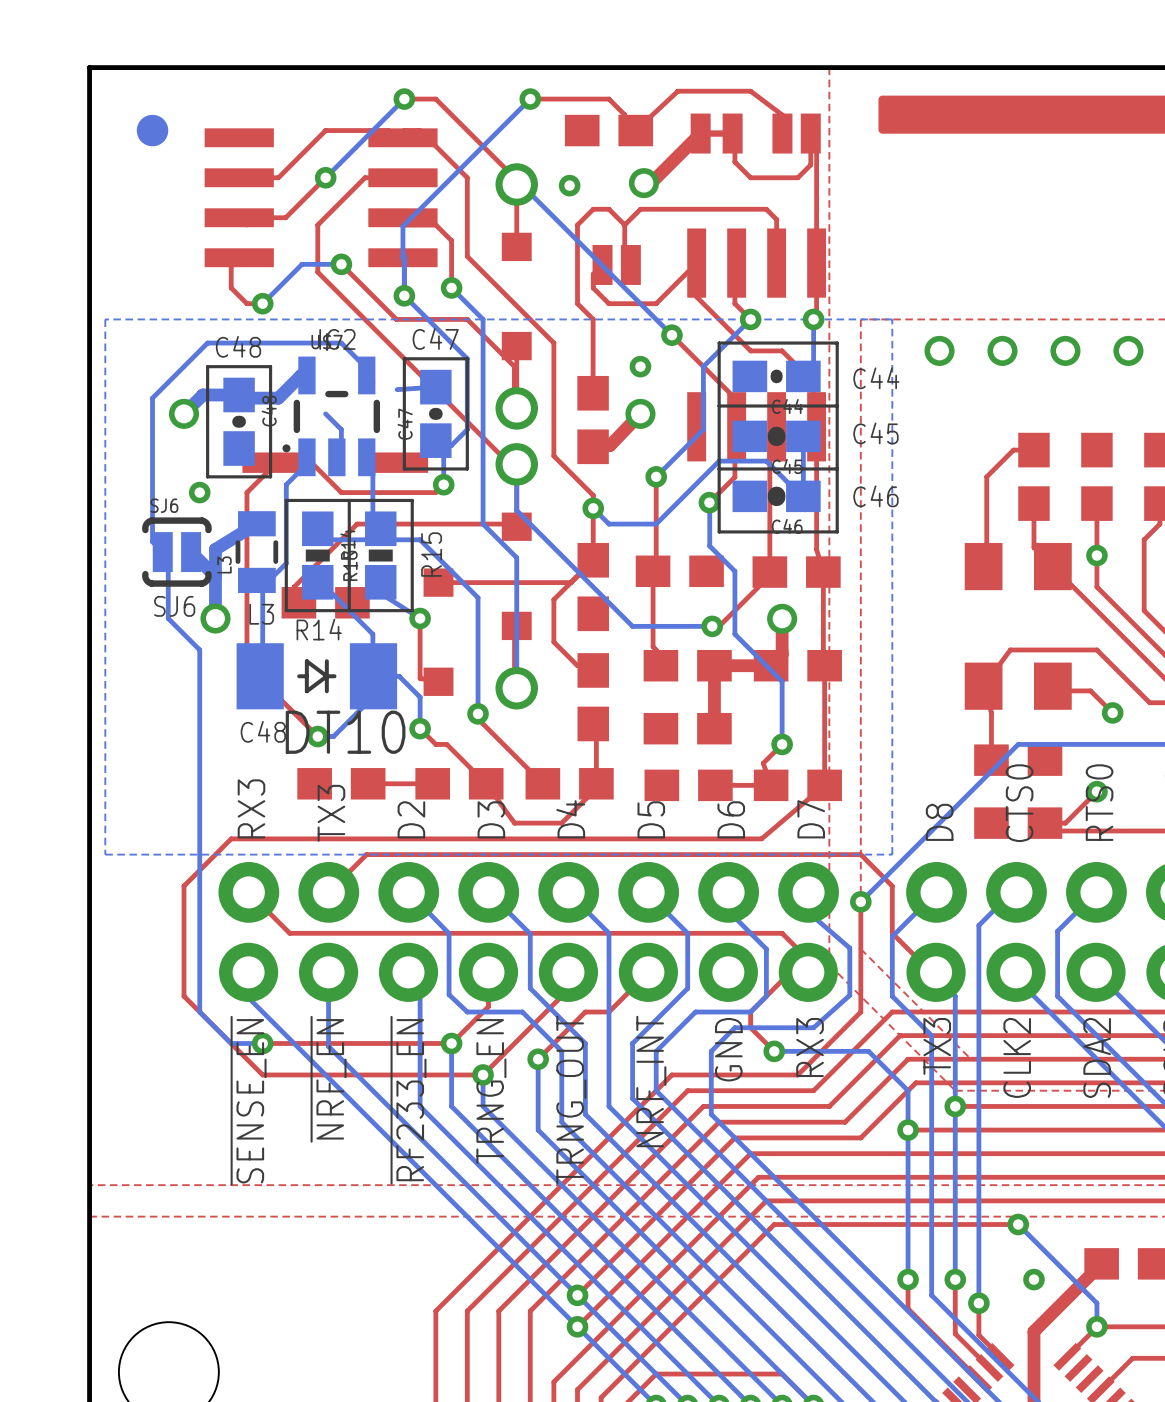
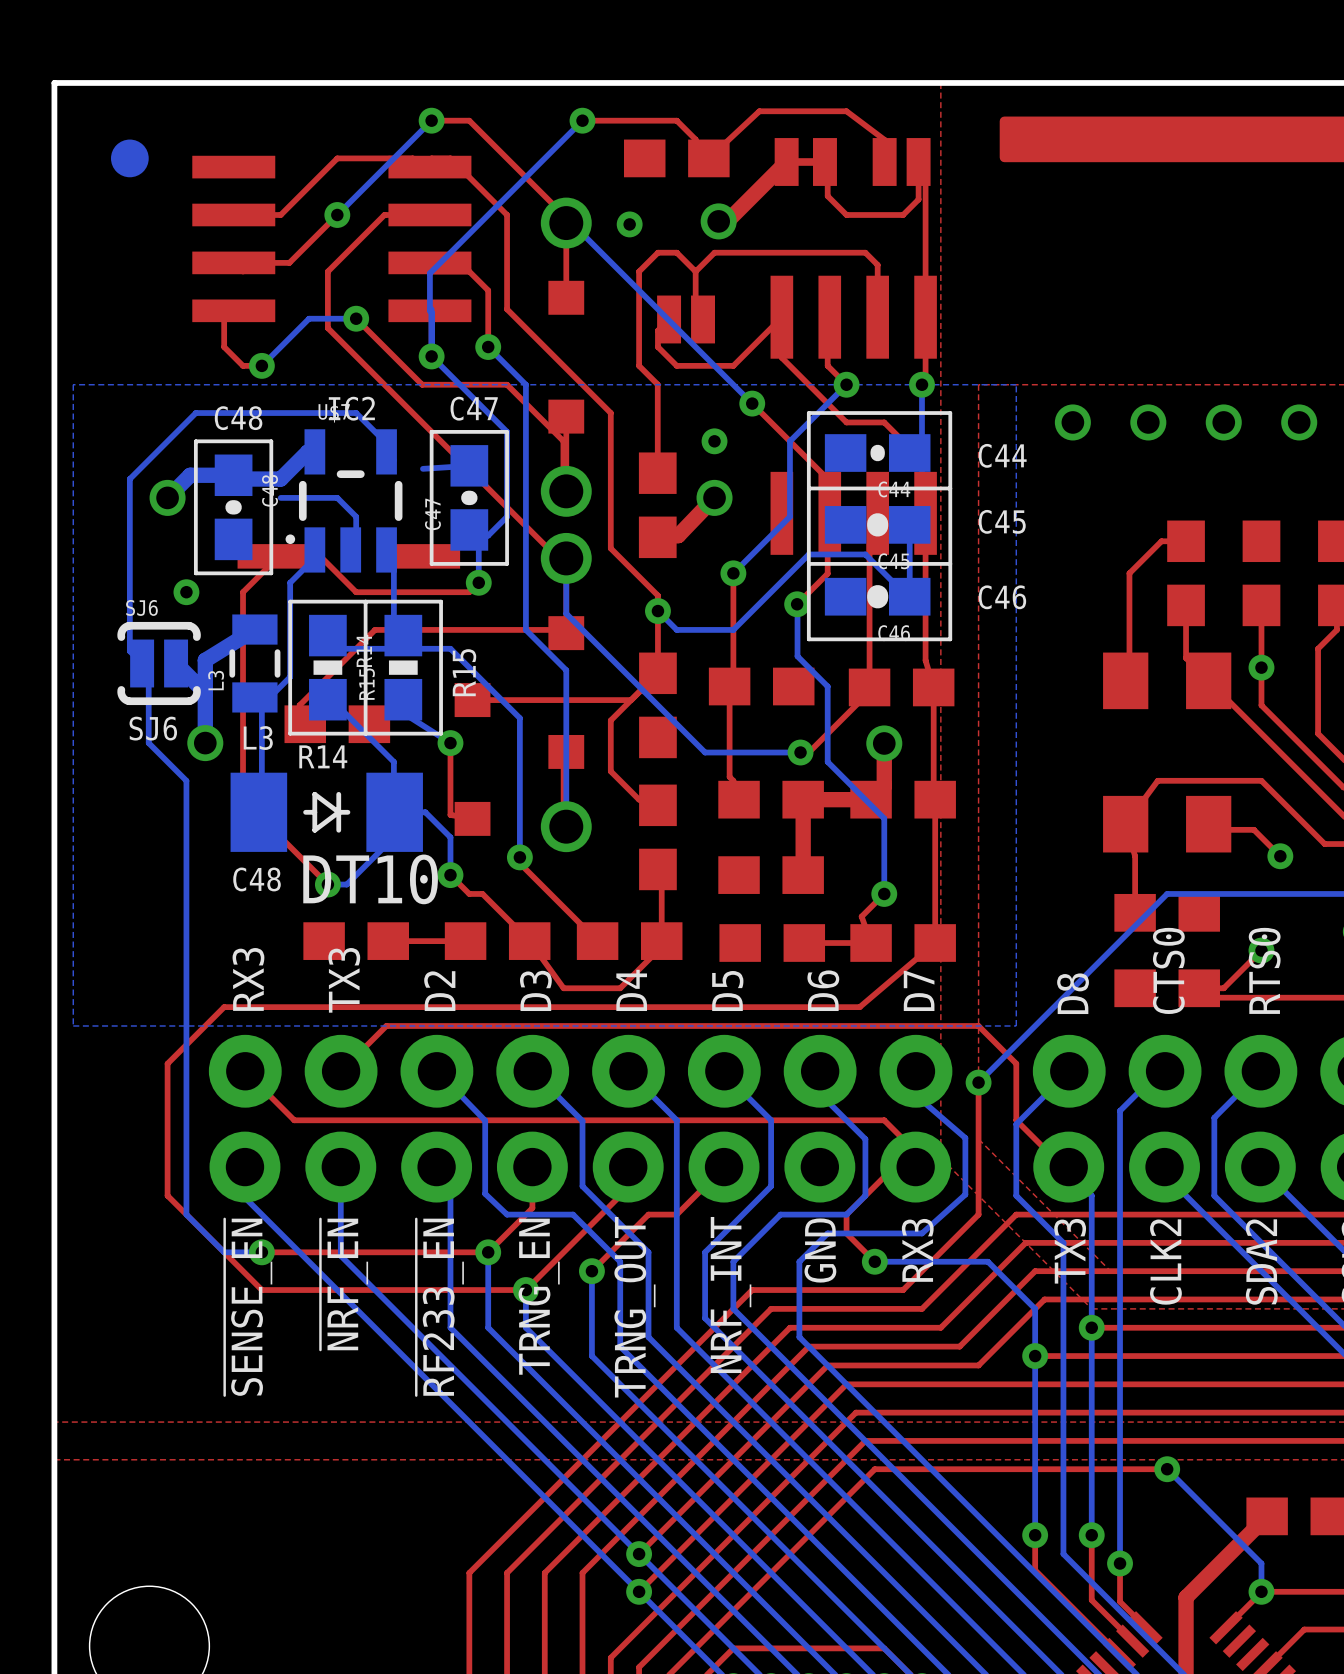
bottom track: none -> (337, 497) (280, 497)
via: (1033, 1279) -> none

